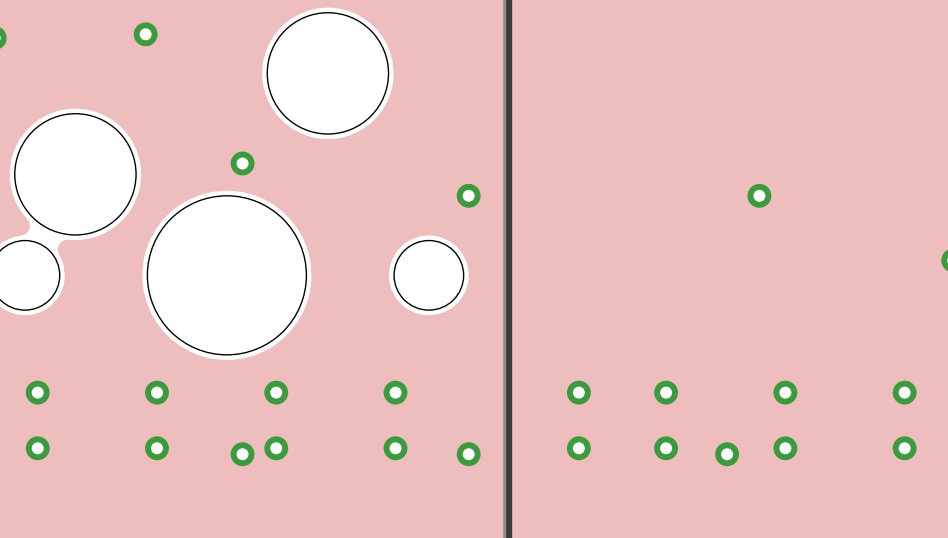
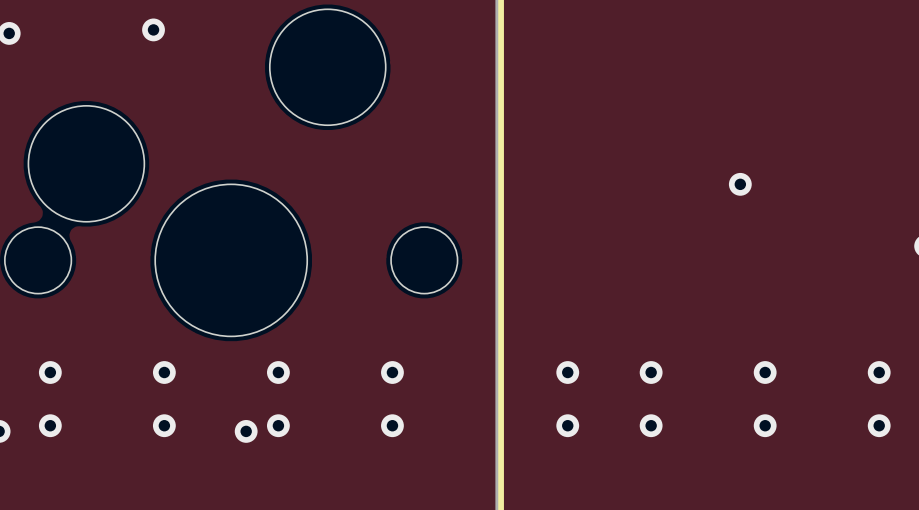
via: (242, 163) -> none
via: (468, 195) -> none
via: (468, 454) -> none
via: (727, 454) -> none

